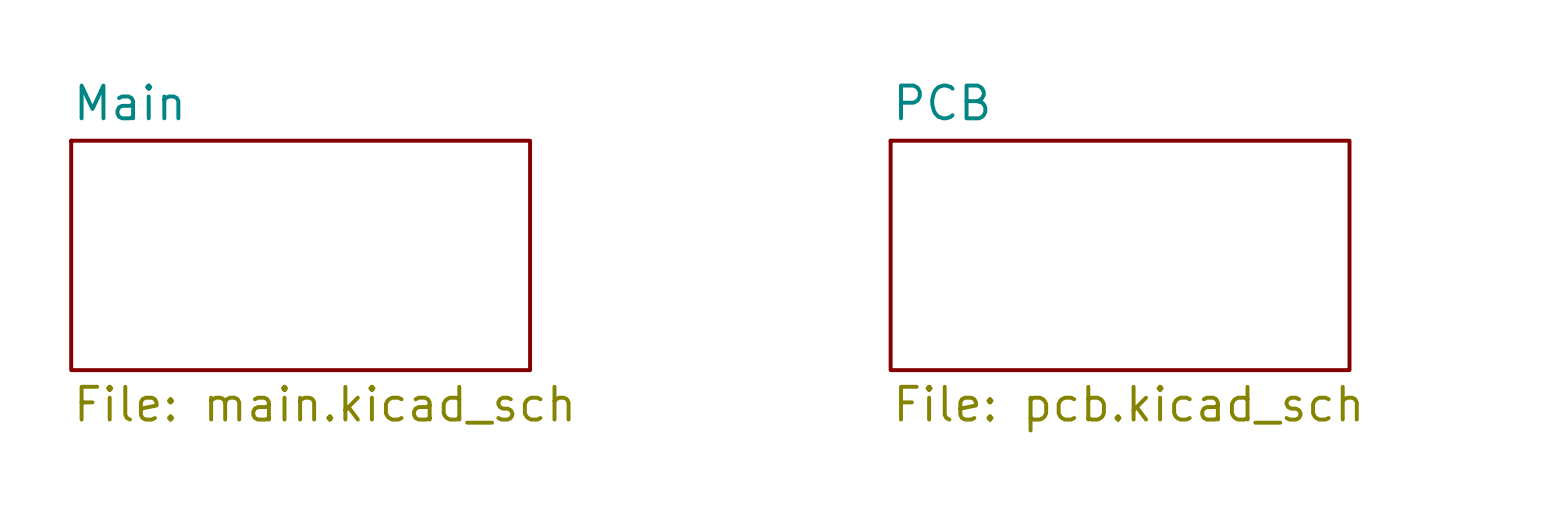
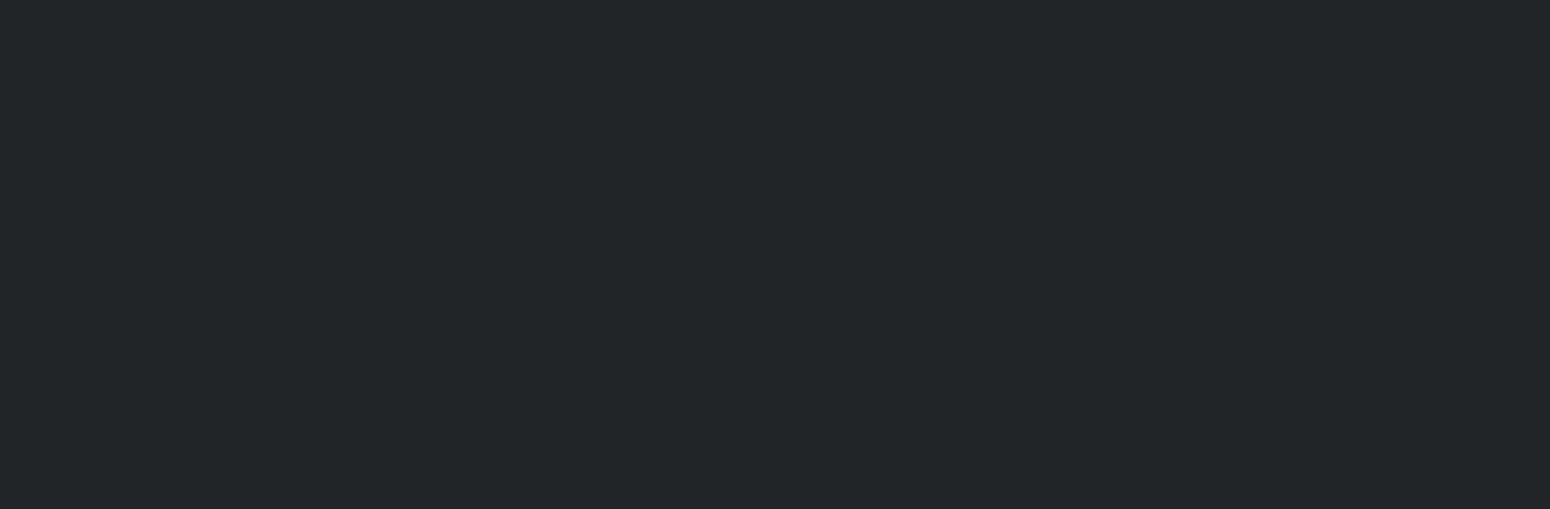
sheet Main: File: main.kicad_sch (300, 255) -> none
sheet PCB: File: pcb.kicad_sch (1120, 255) -> none

